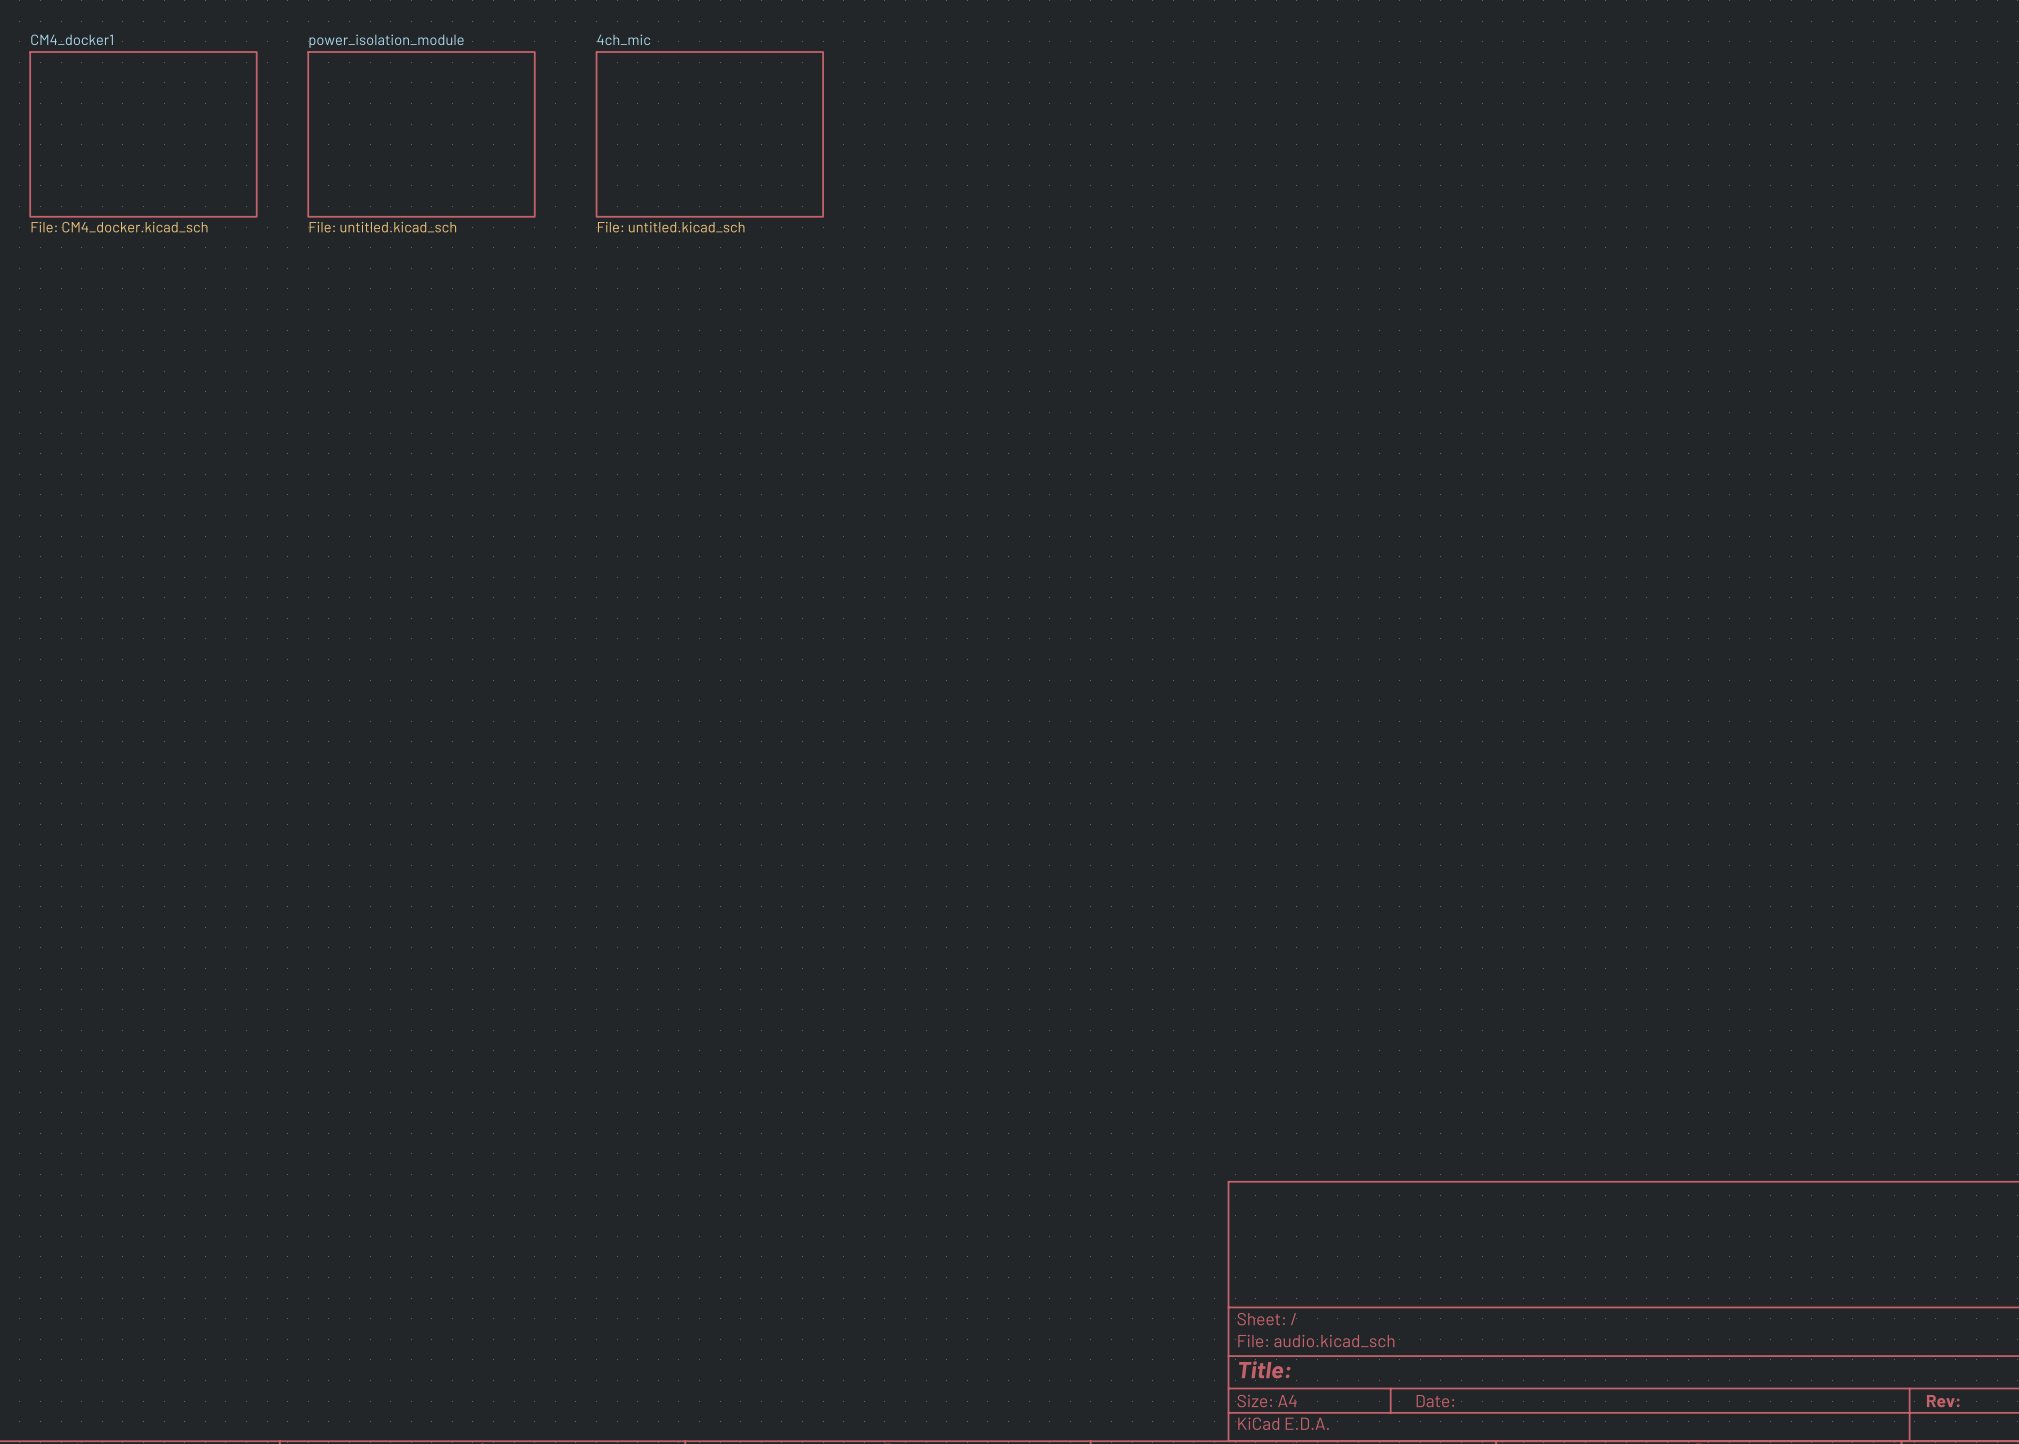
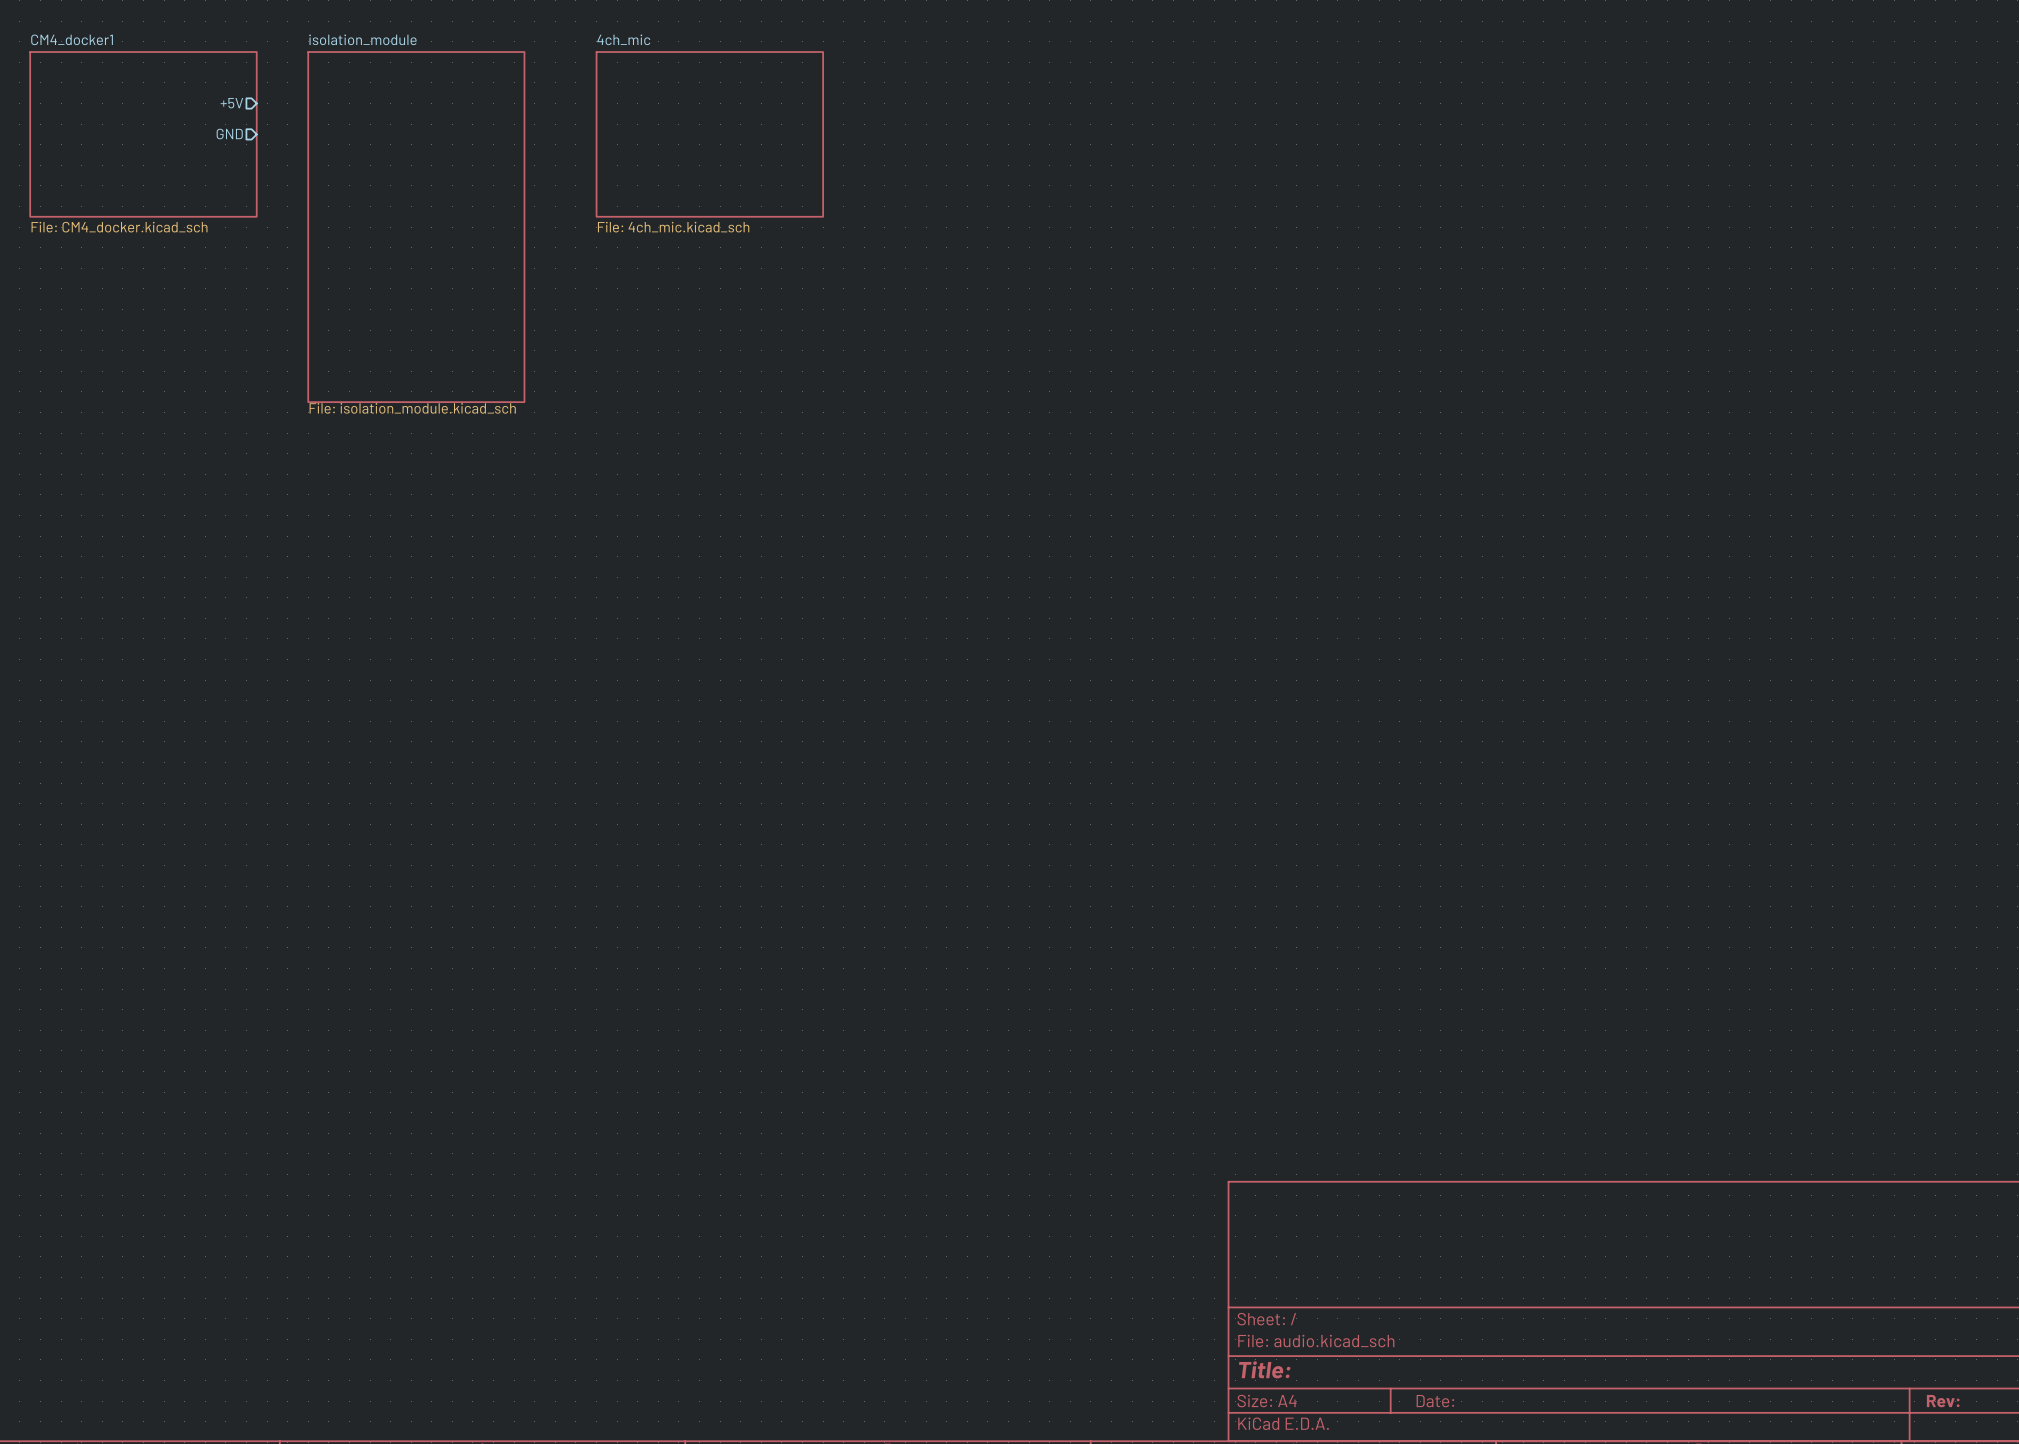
sheet pin: none -> +5V (231, 103)
sheet pin: none -> GND (229, 134)
sheet power_isolation_module: File: untitled.kicad_sch (421, 134) -> none
sheet isolation_module: none -> File: isolation_module.kicad_sch (416, 227)
sheet 4ch_mic value: File: untitled.kicad_sch (671, 227) -> File: 4ch_mic.kicad_sch (673, 227)

